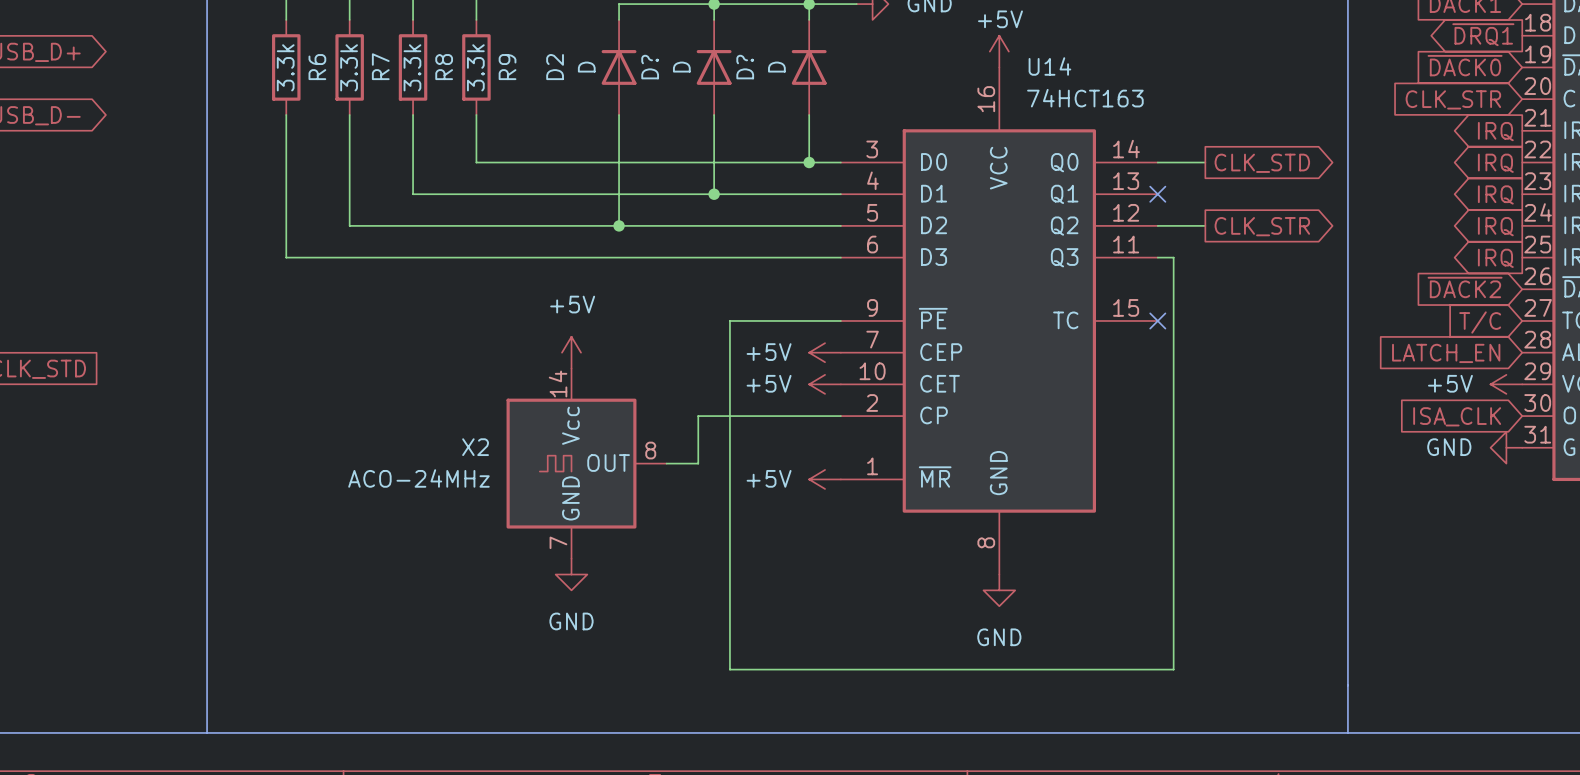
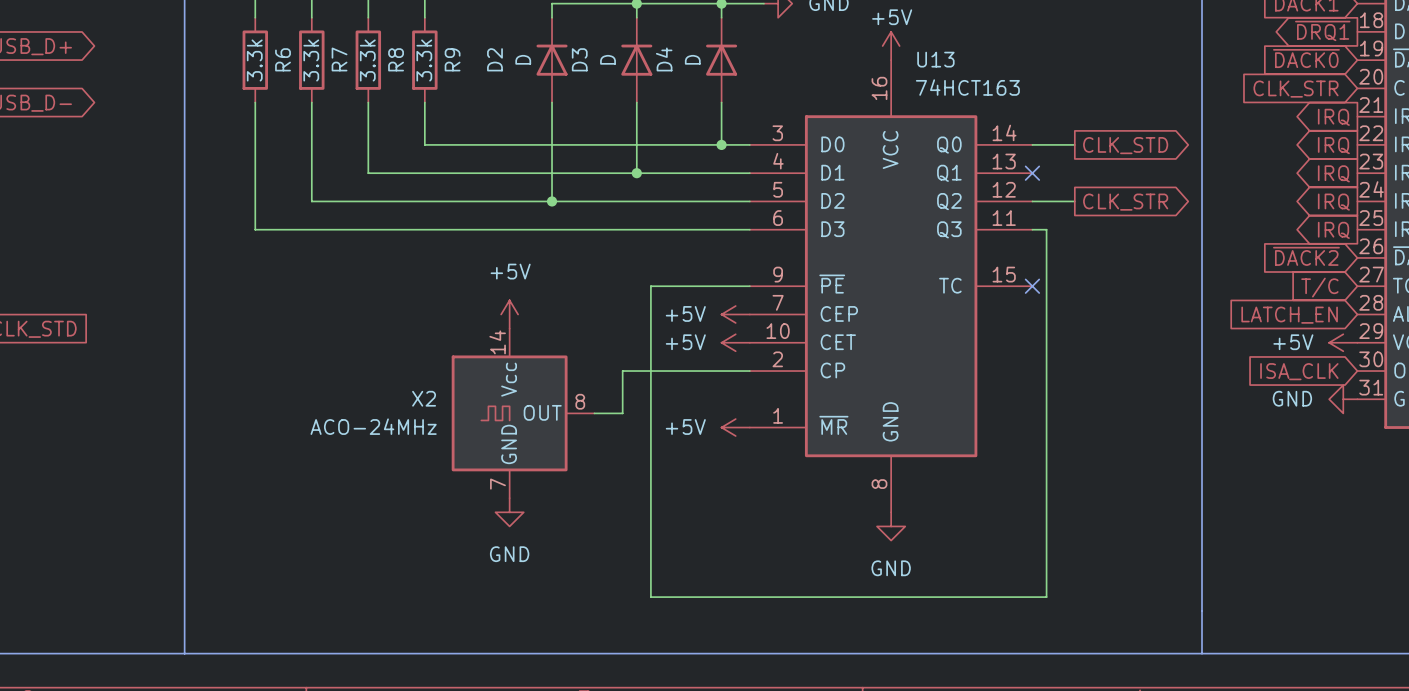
U14 name: U14 (1049, 66) -> U13 (935, 59)
D? name: D? (650, 67) -> D3 (579, 59)
D? name: D? (745, 67) -> D4 (664, 59)

